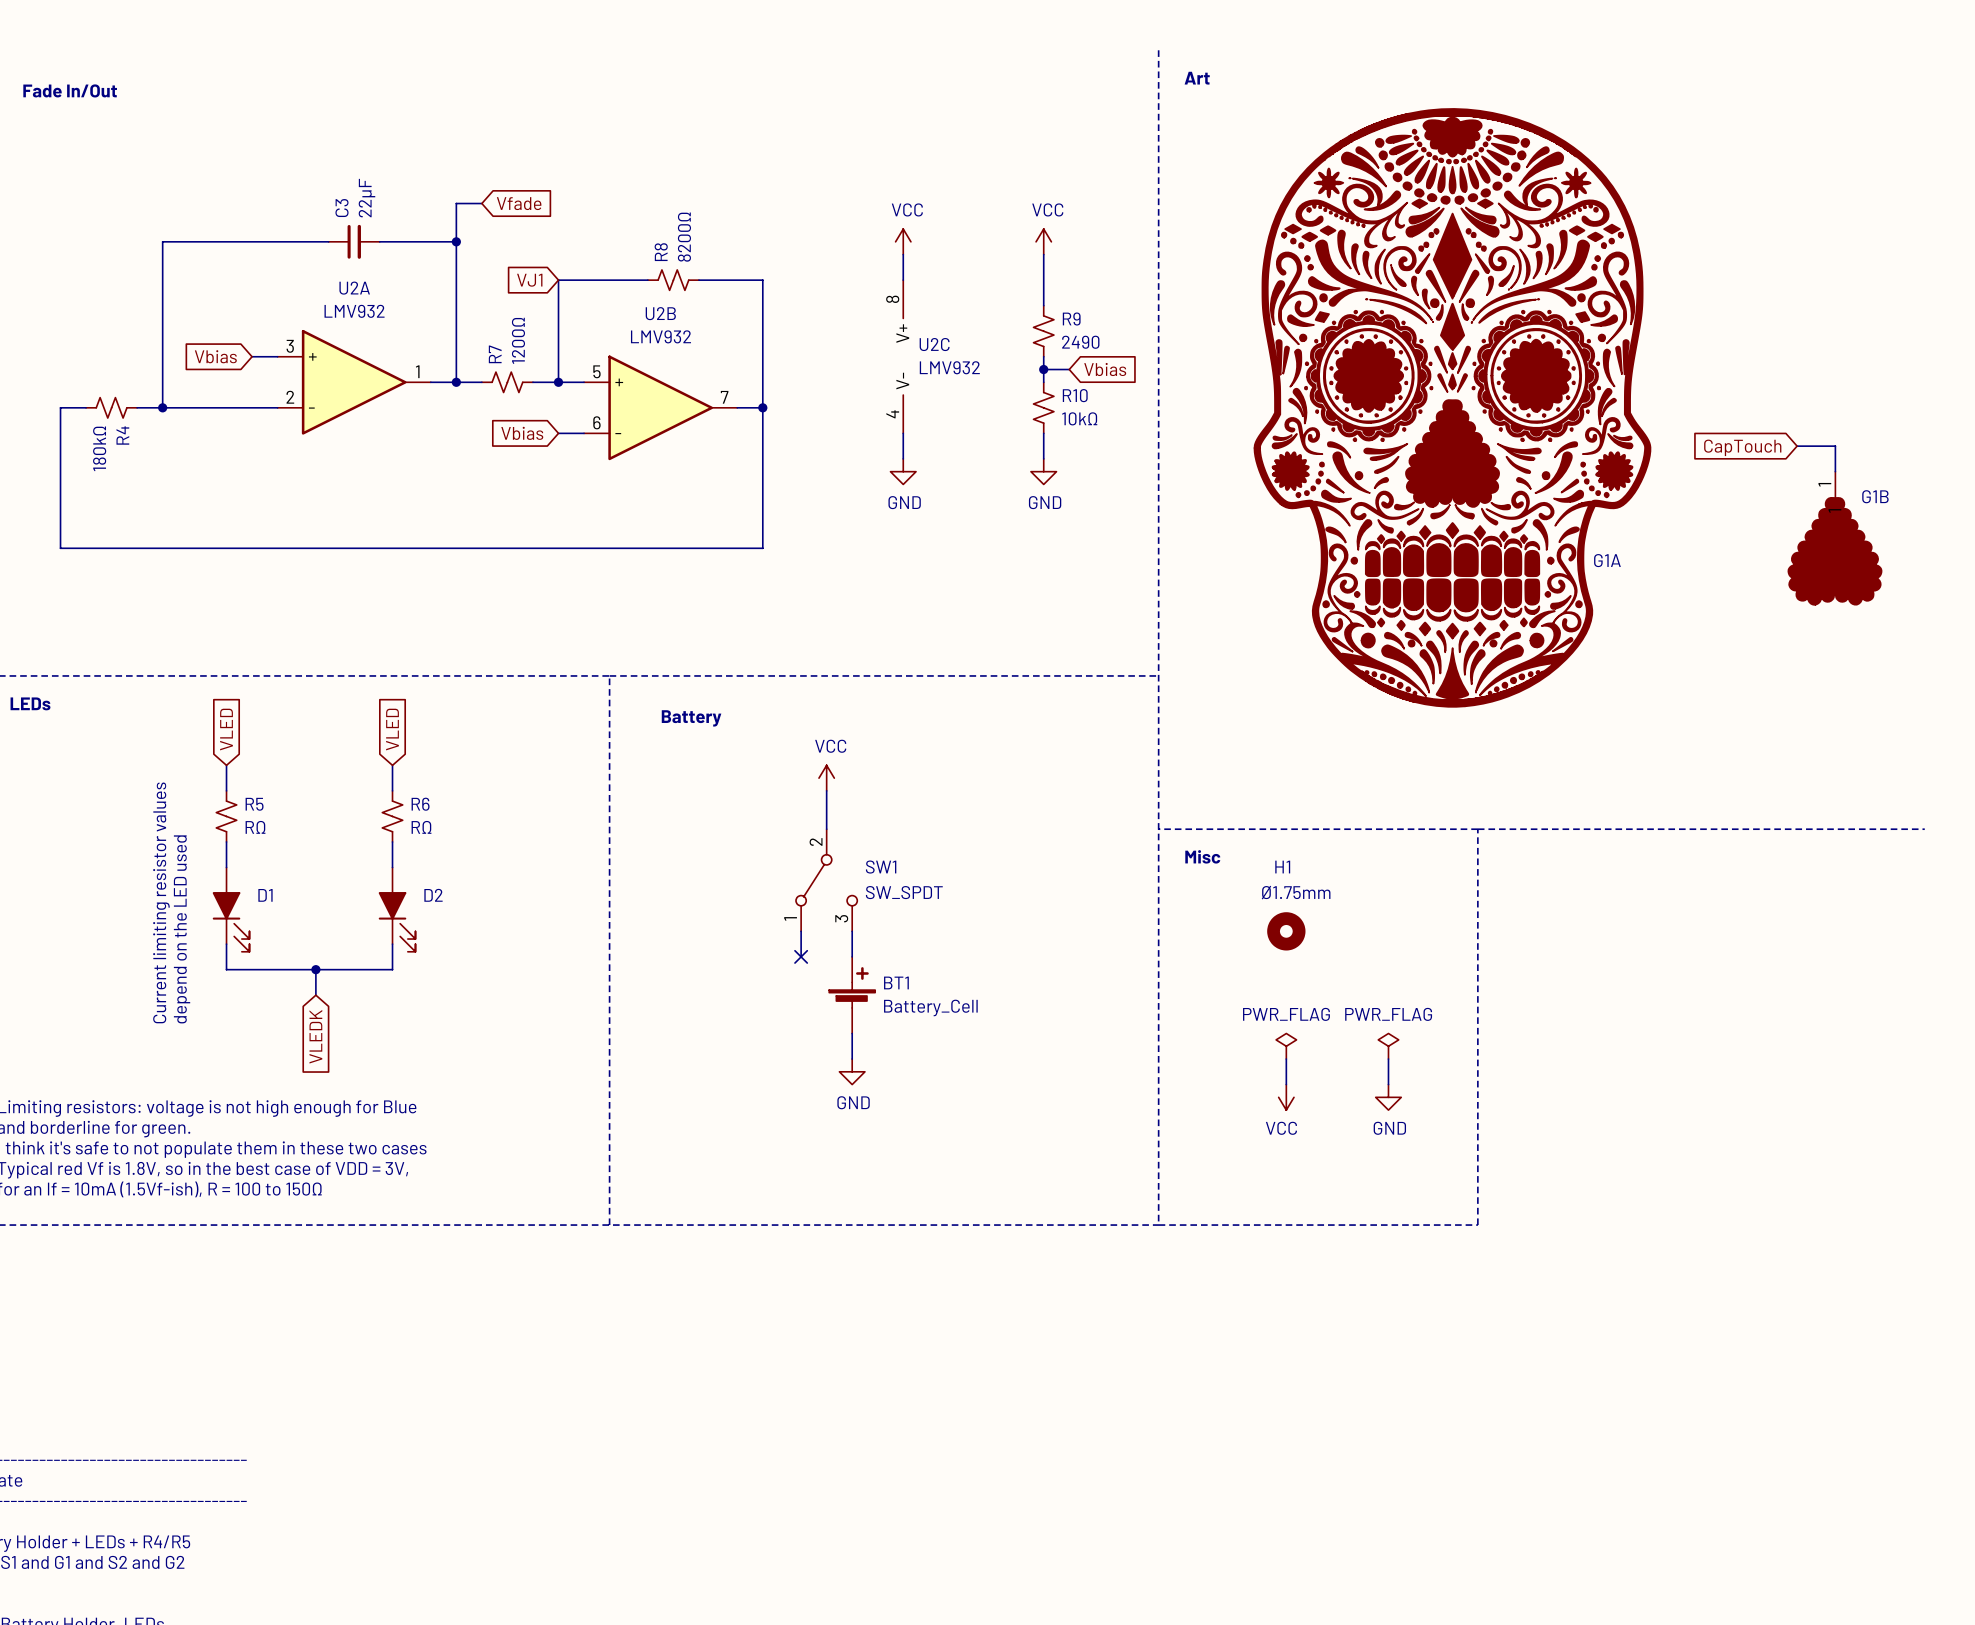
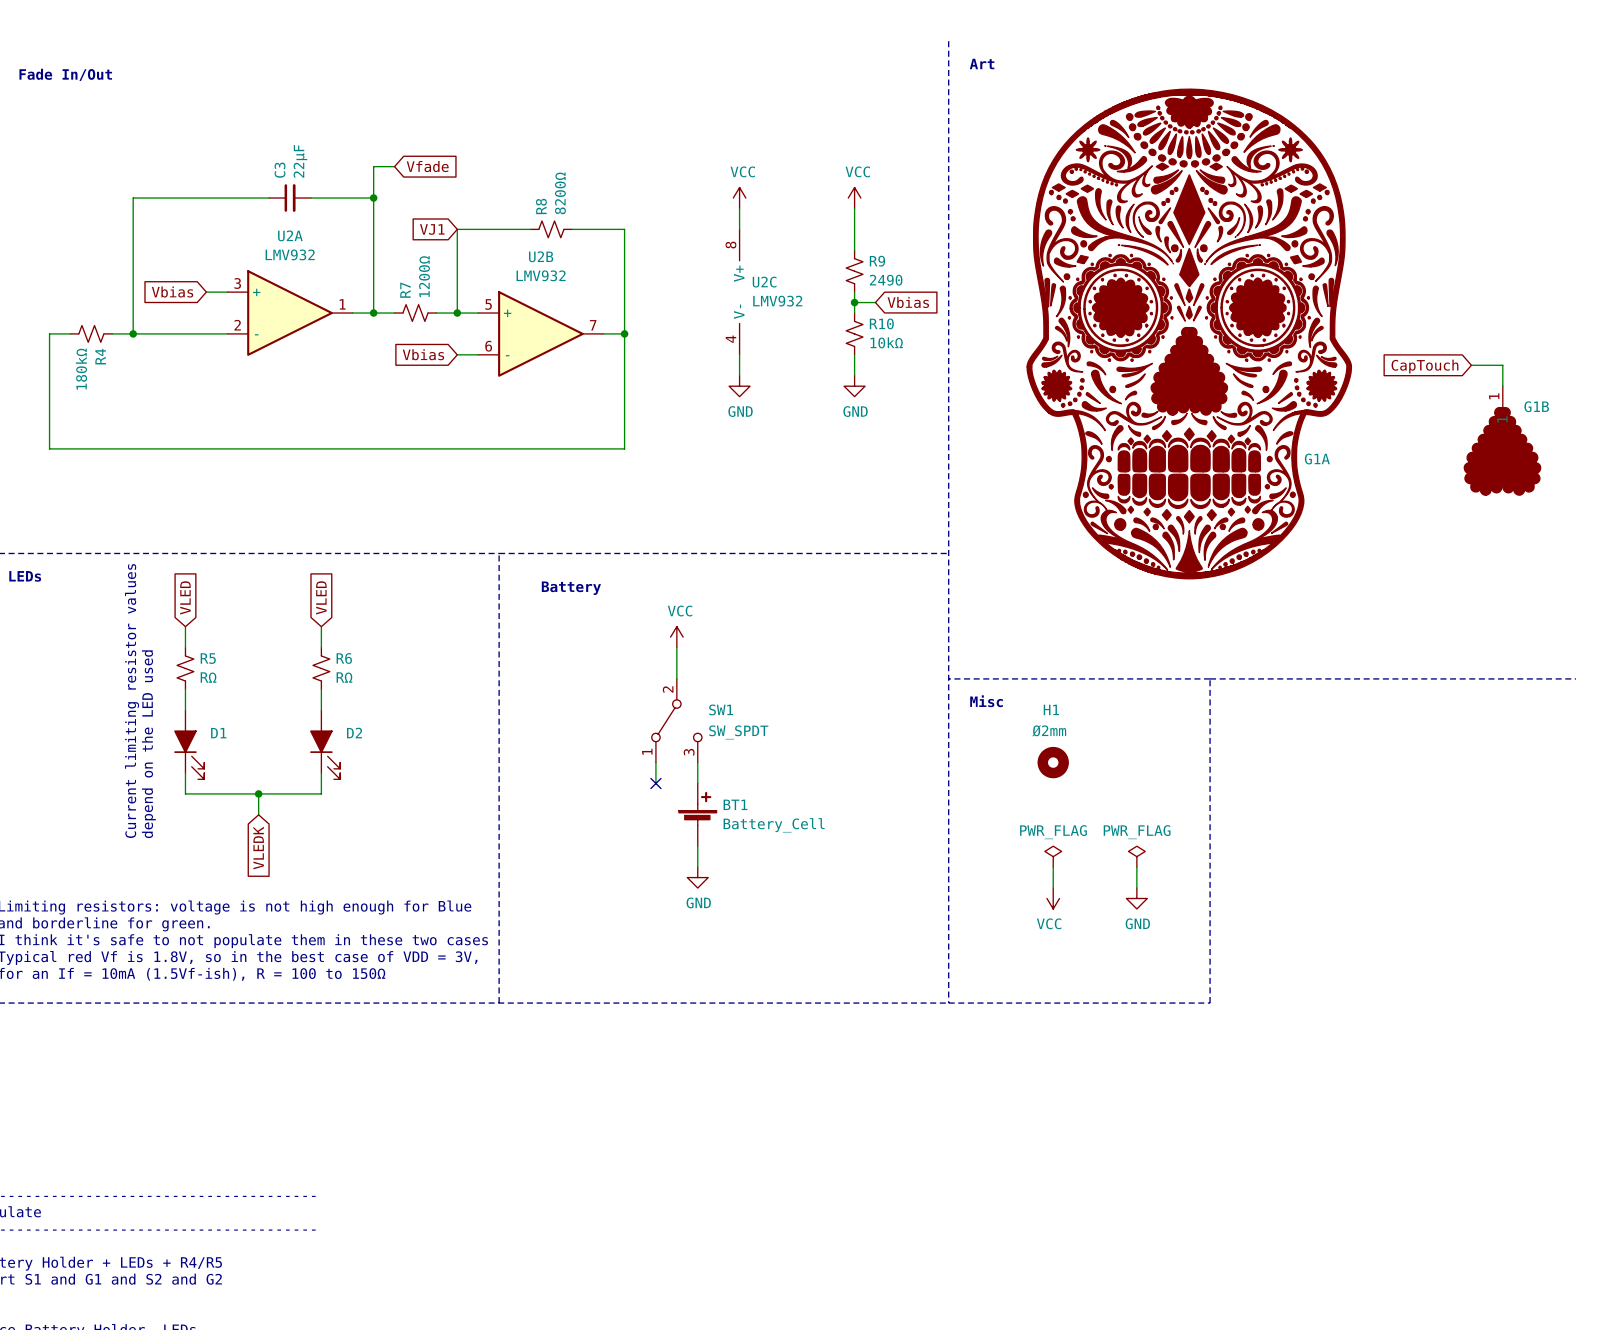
H1 value: Ø1.75mm (1296, 892) -> Ø2mm (1049, 730)

